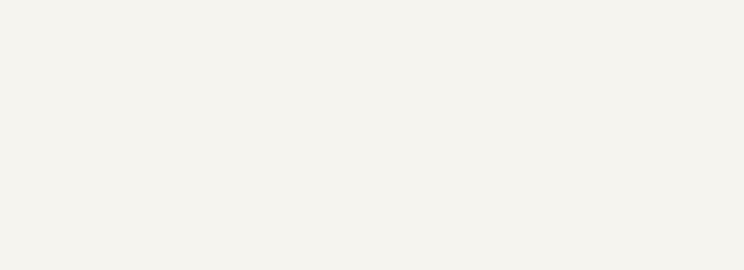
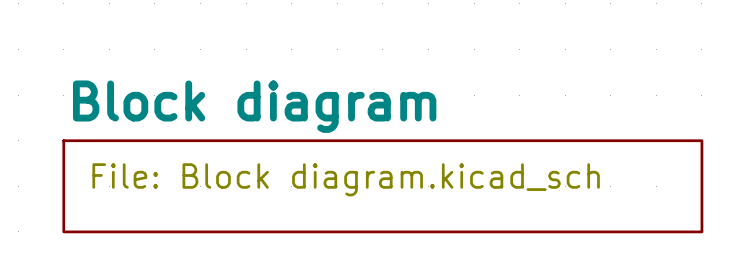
sheet Block diagram: none -> File: Block diagram.kicad_sch (382, 186)

